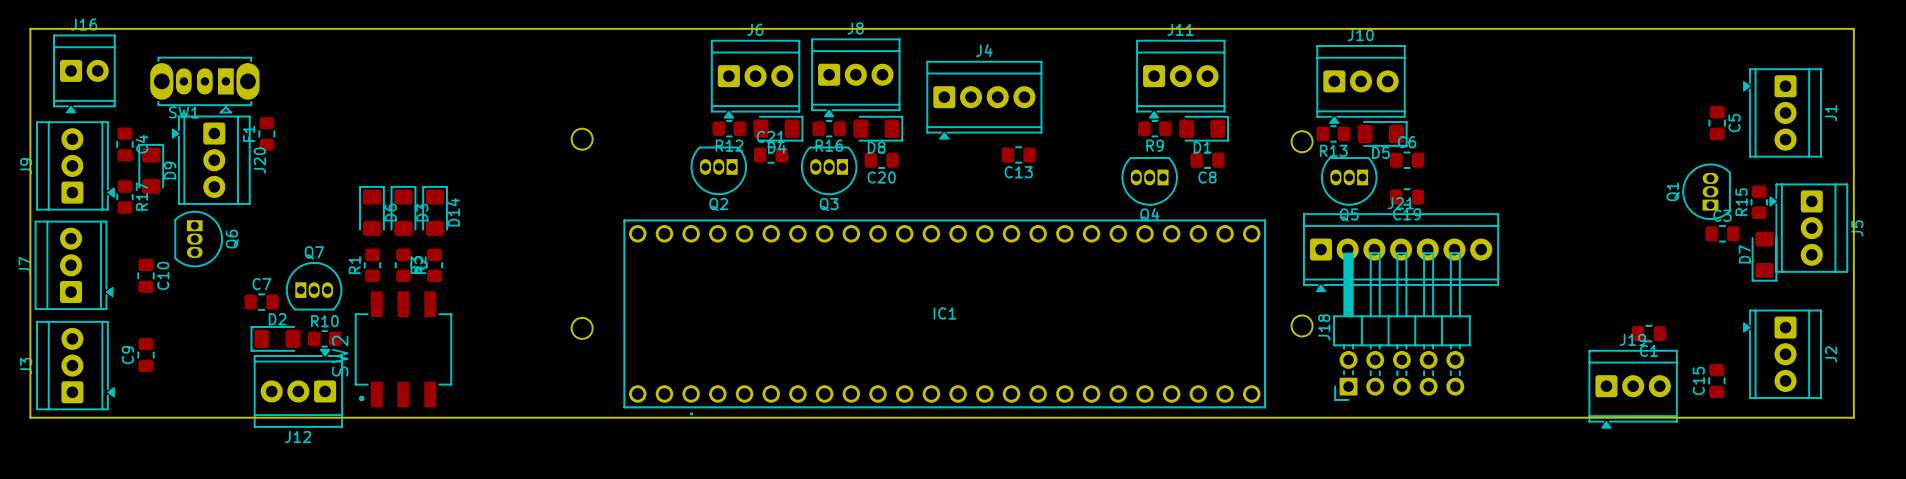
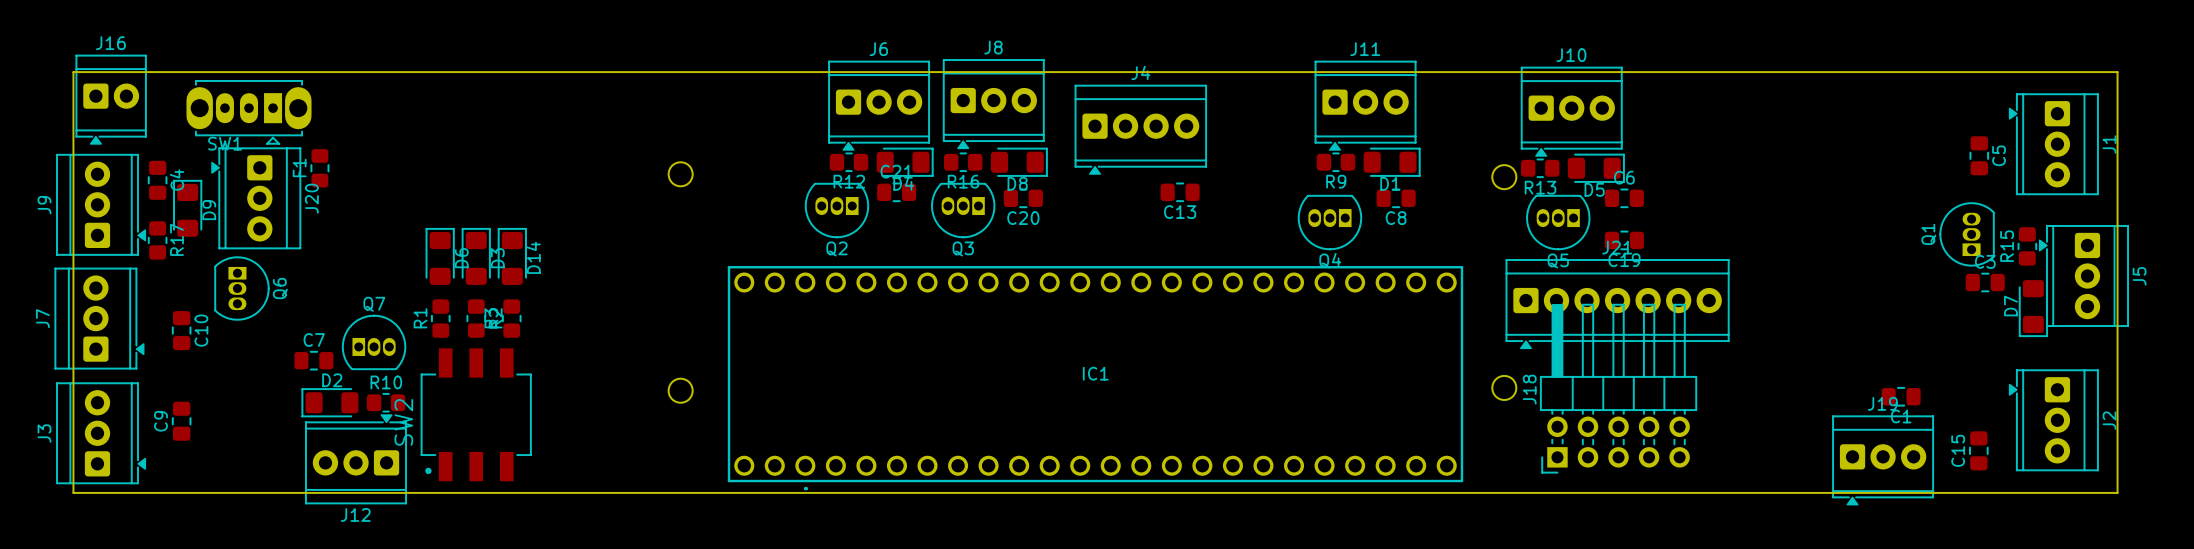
board edge: (51, 417) (30, 417) (30, 28) (1853, 28) (1853, 417) (1838, 417) -> (73, 492) (73, 72) (2117, 72) (2117, 492)

